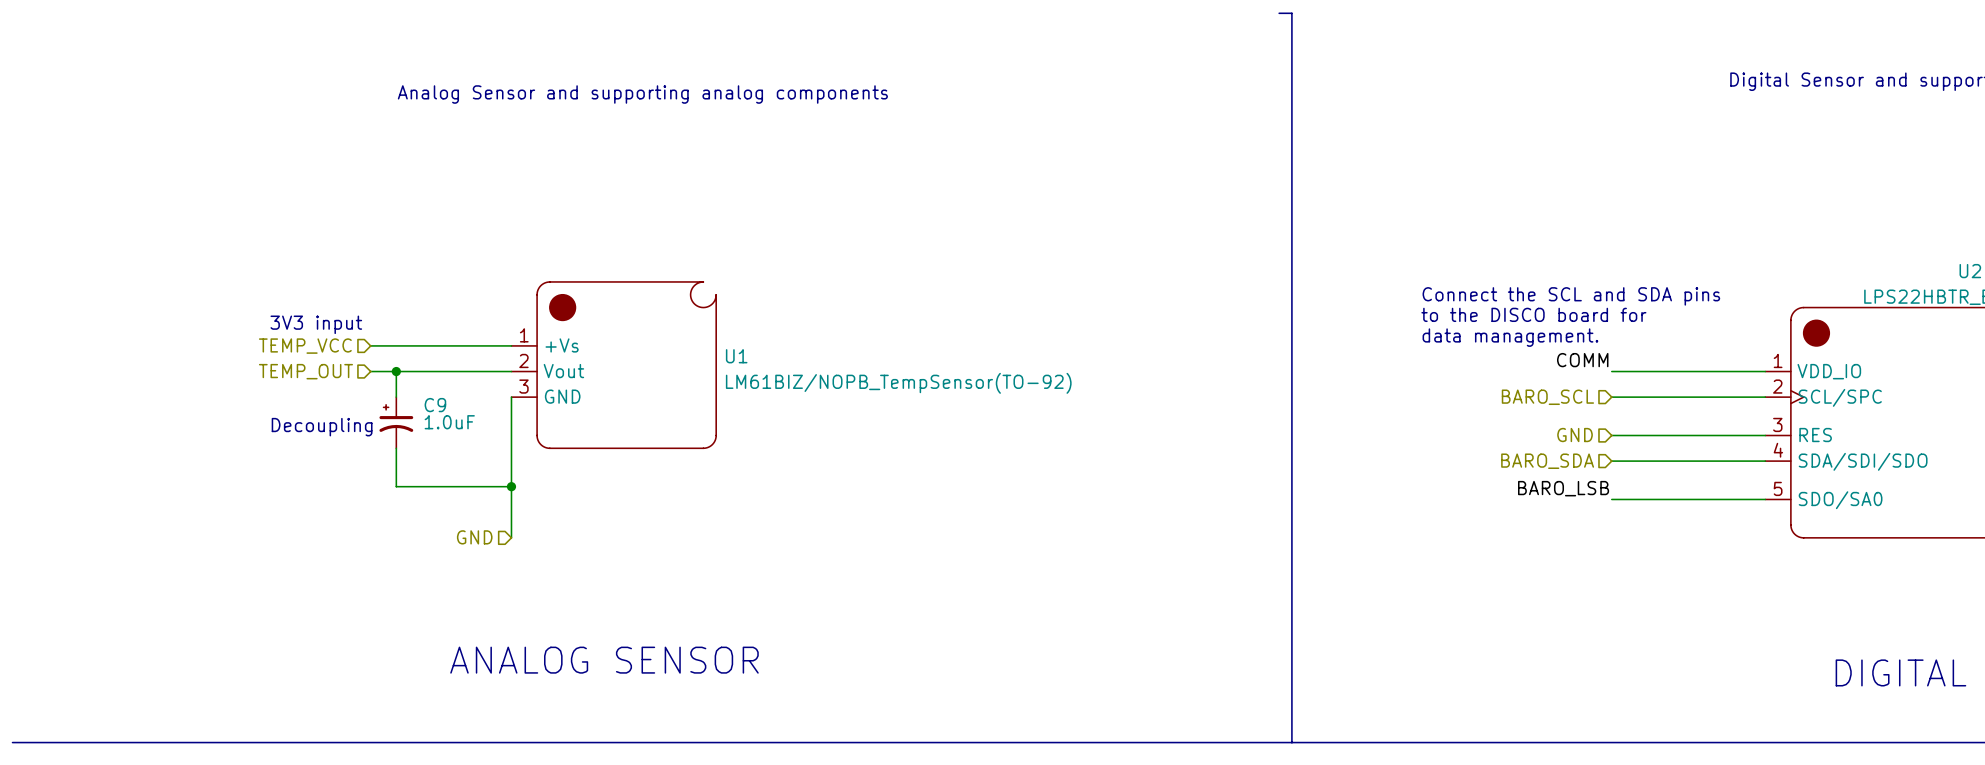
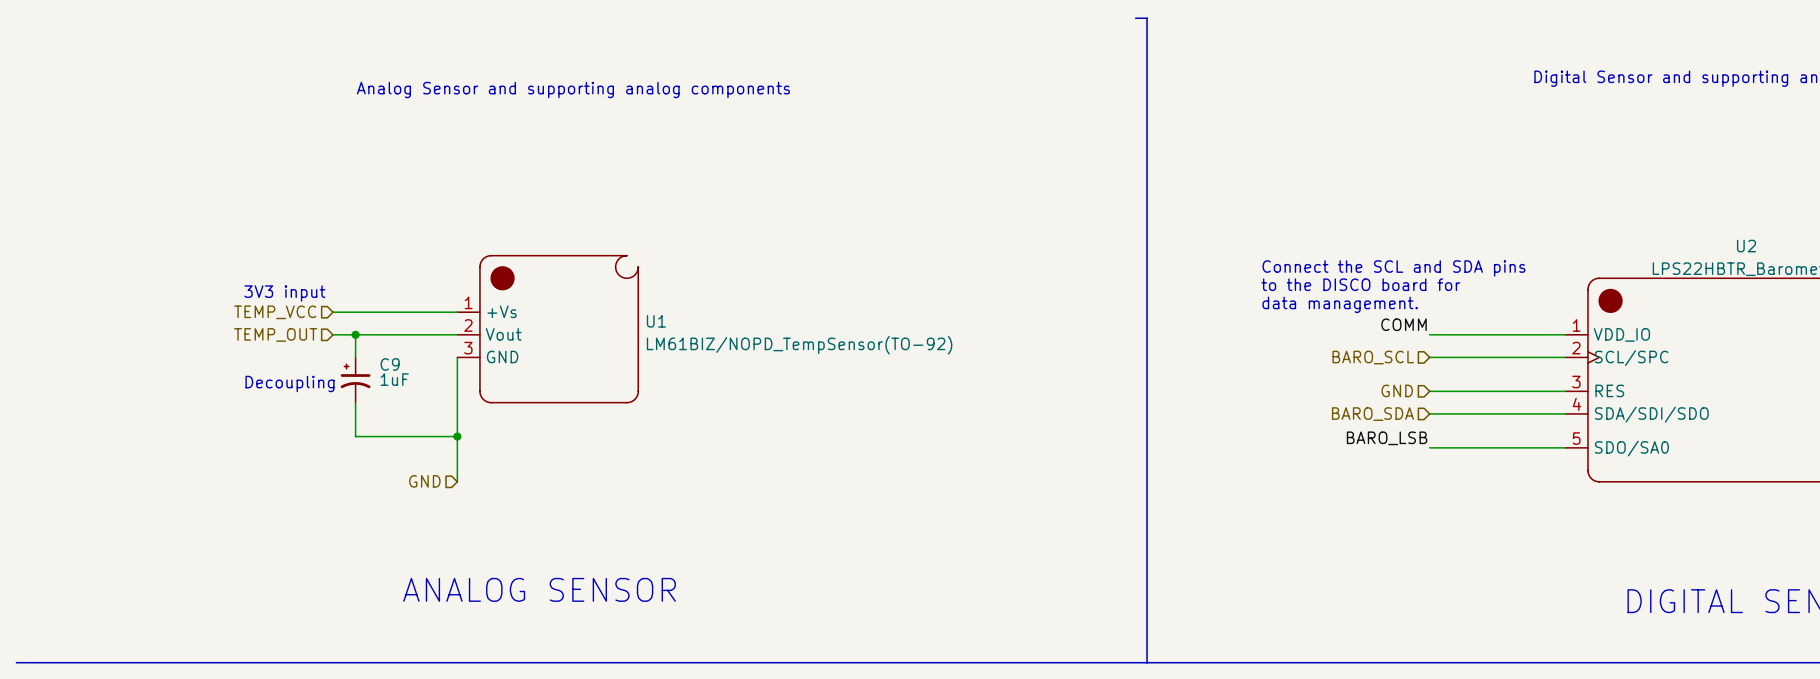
U1 value: LM61BIZ/NOPB_TempSensor(TO-92) (898, 383) -> LM61BIZ/NOPD_TempSensor(TO-92) (799, 345)
C9 value: 1.0uF (449, 422) -> 1uF (394, 379)

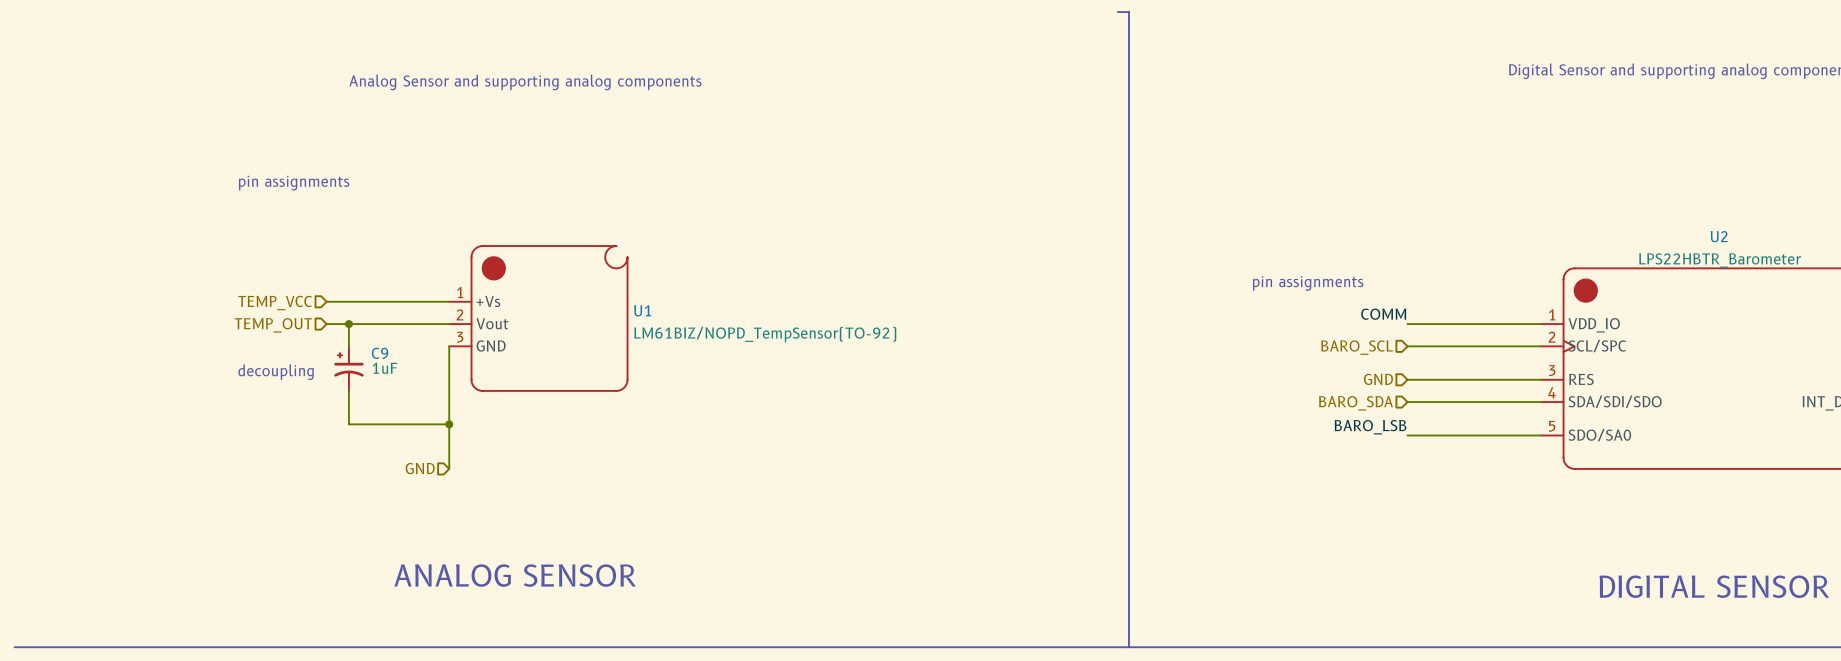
text: none -> pin assignments (294, 183)
text: Connect the SCL and SDA pins (1393, 268) -> none
text: to the DISCO board for (1360, 284) -> none
text: 3V3 input (284, 293) -> none
text: none -> pin assignments (1308, 283)
text: data management. (1340, 304) -> none
text: Decoupling (289, 383) -> decoupling (276, 372)

